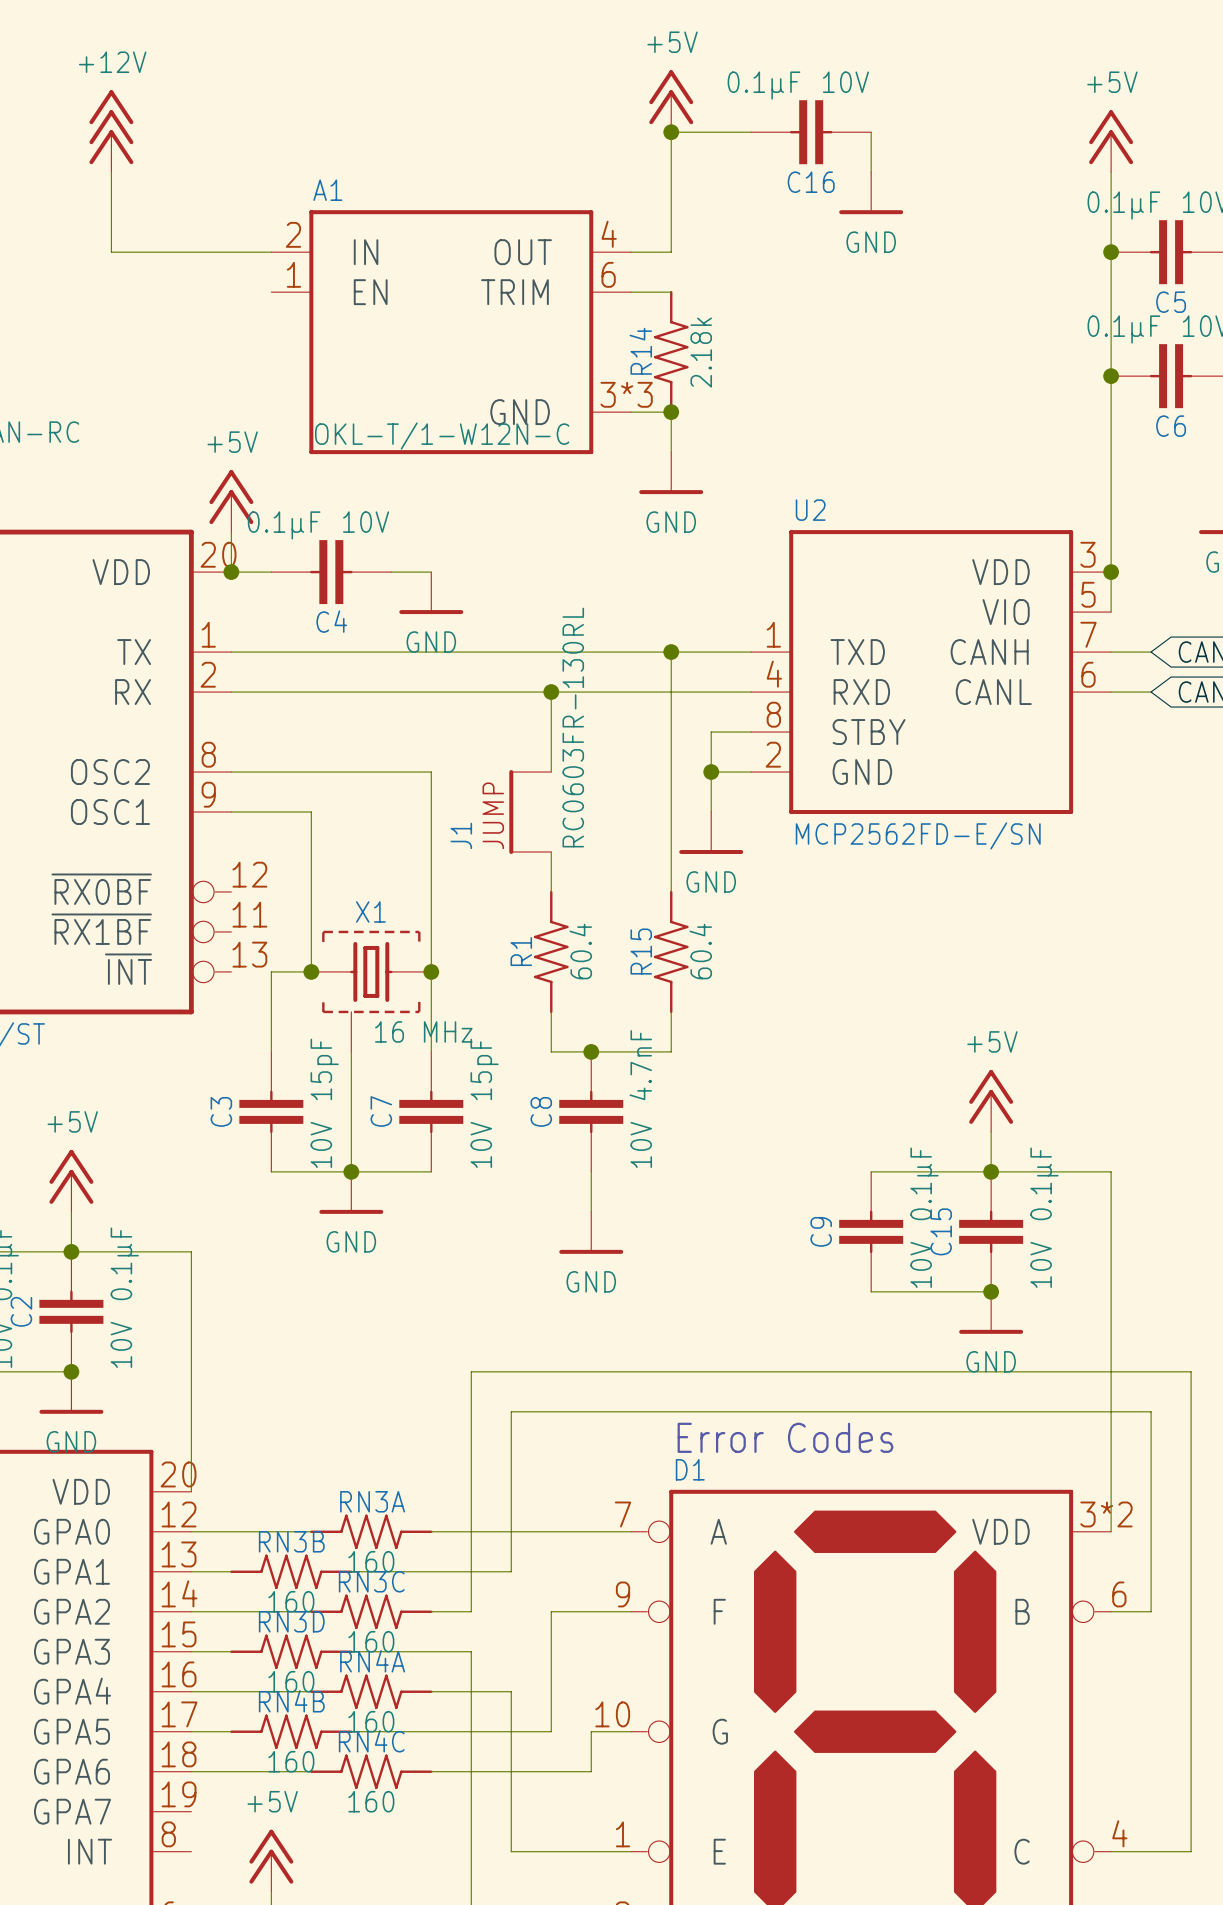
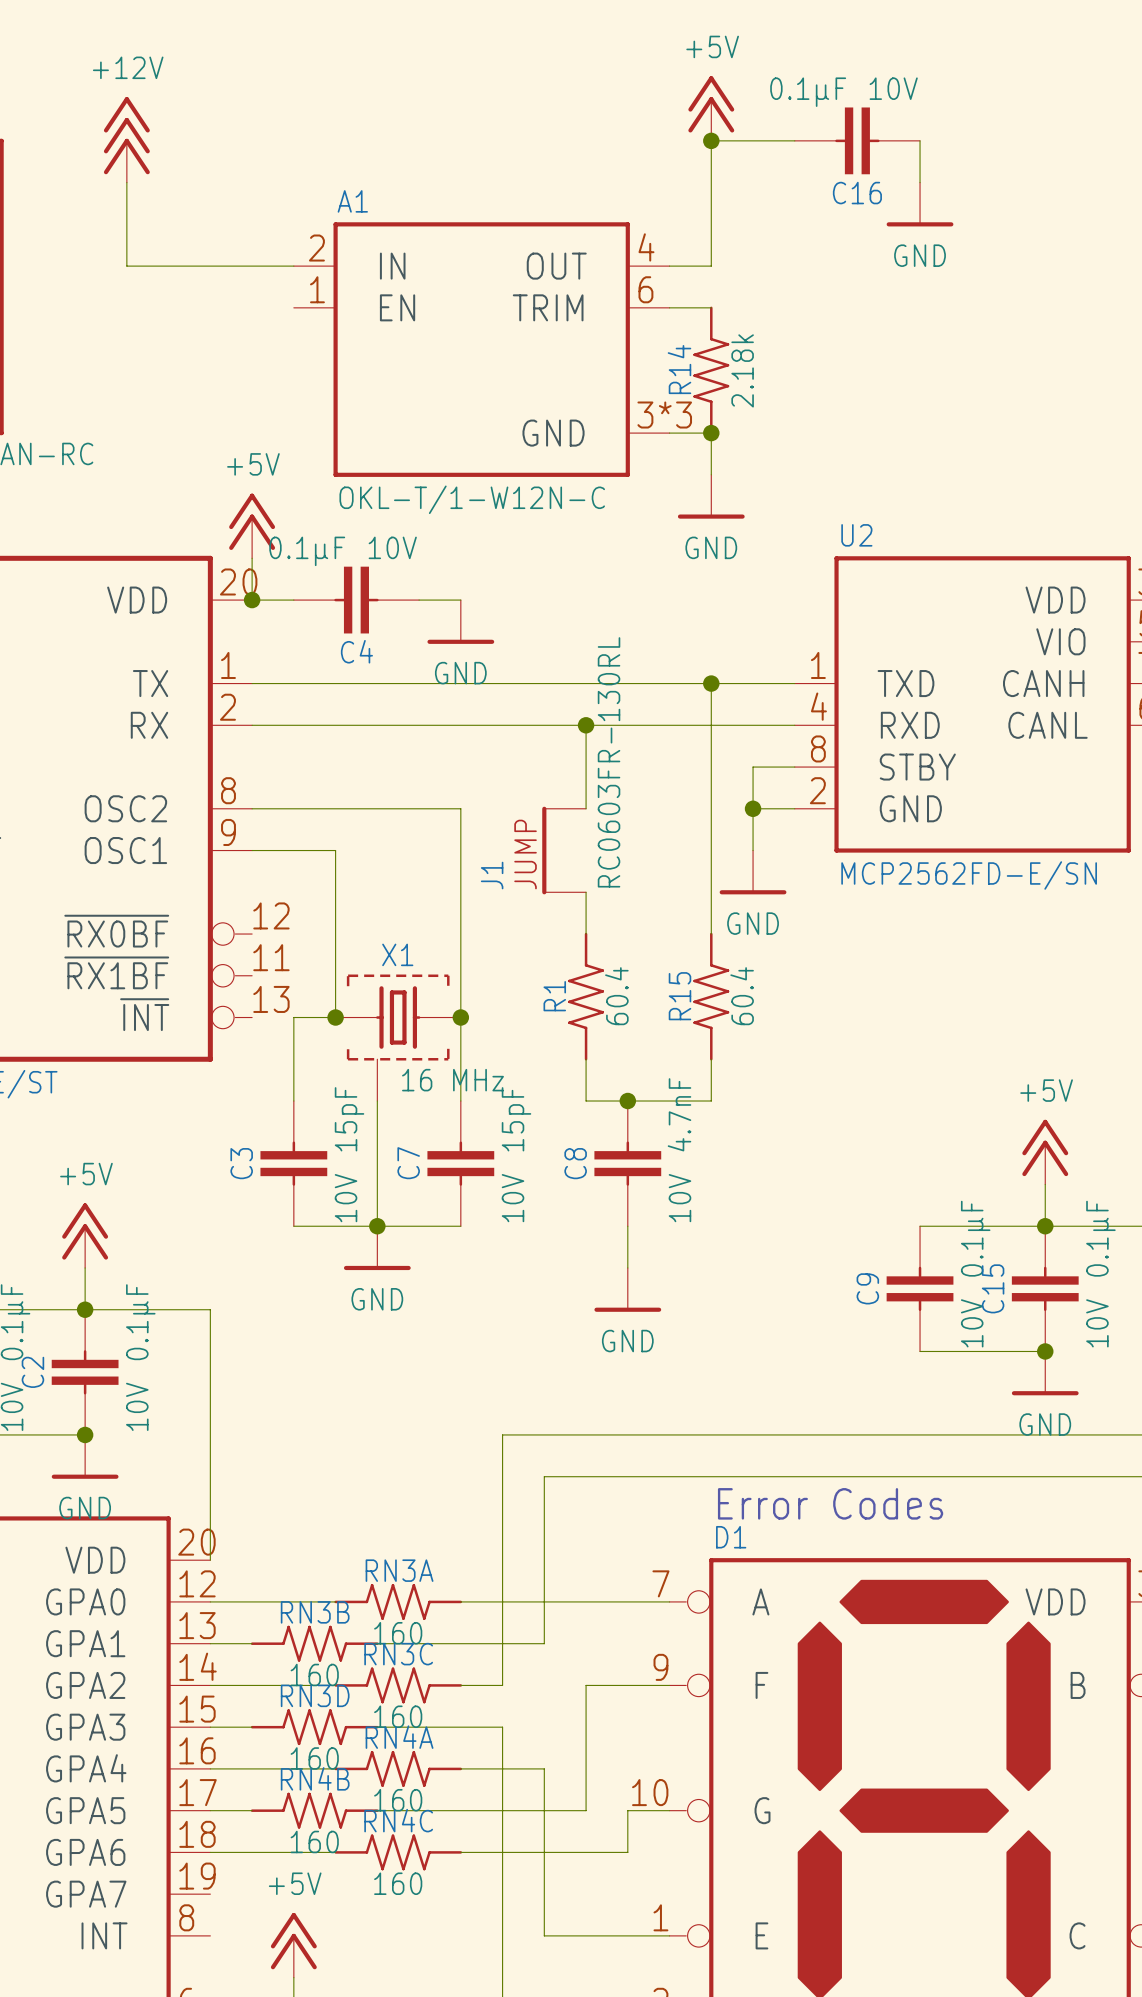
A1 text position: OKL-T/1-W12N-C (442, 436) -> OKL-T/1-W12N-C (472, 499)

